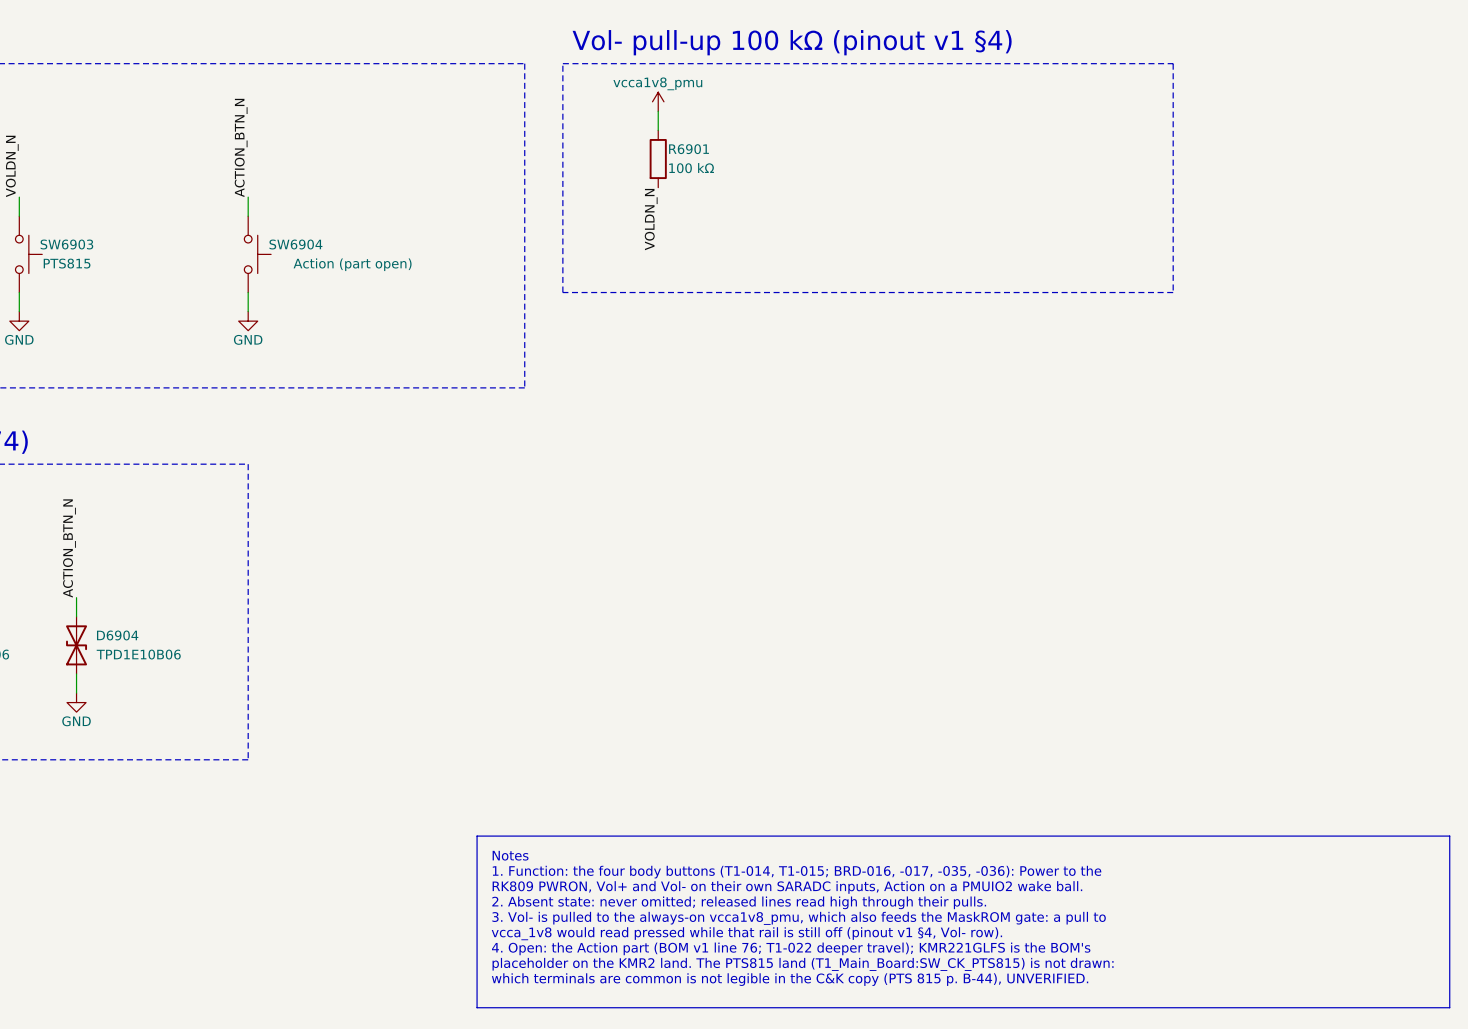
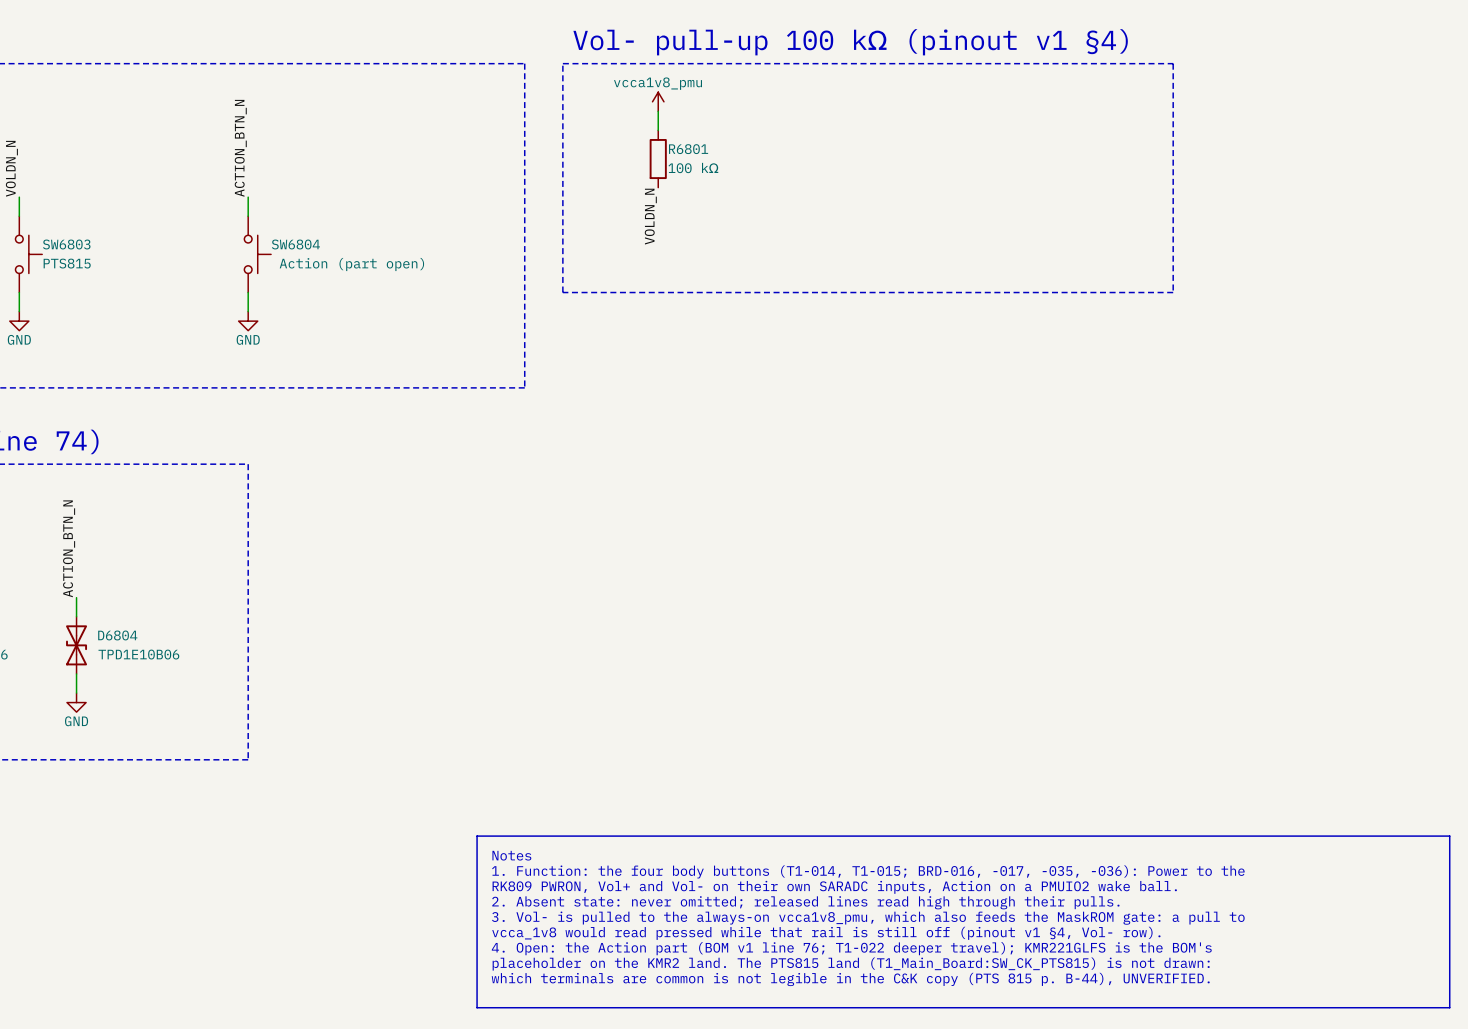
R6901 name: R6901 (689, 149) -> R6801 (688, 149)
SW6903 name: SW6903 (66, 244) -> SW6803 (66, 244)
SW6904 name: SW6904 (295, 244) -> SW6804 (295, 244)
D6904 name: D6904 (117, 635) -> D6804 (117, 635)

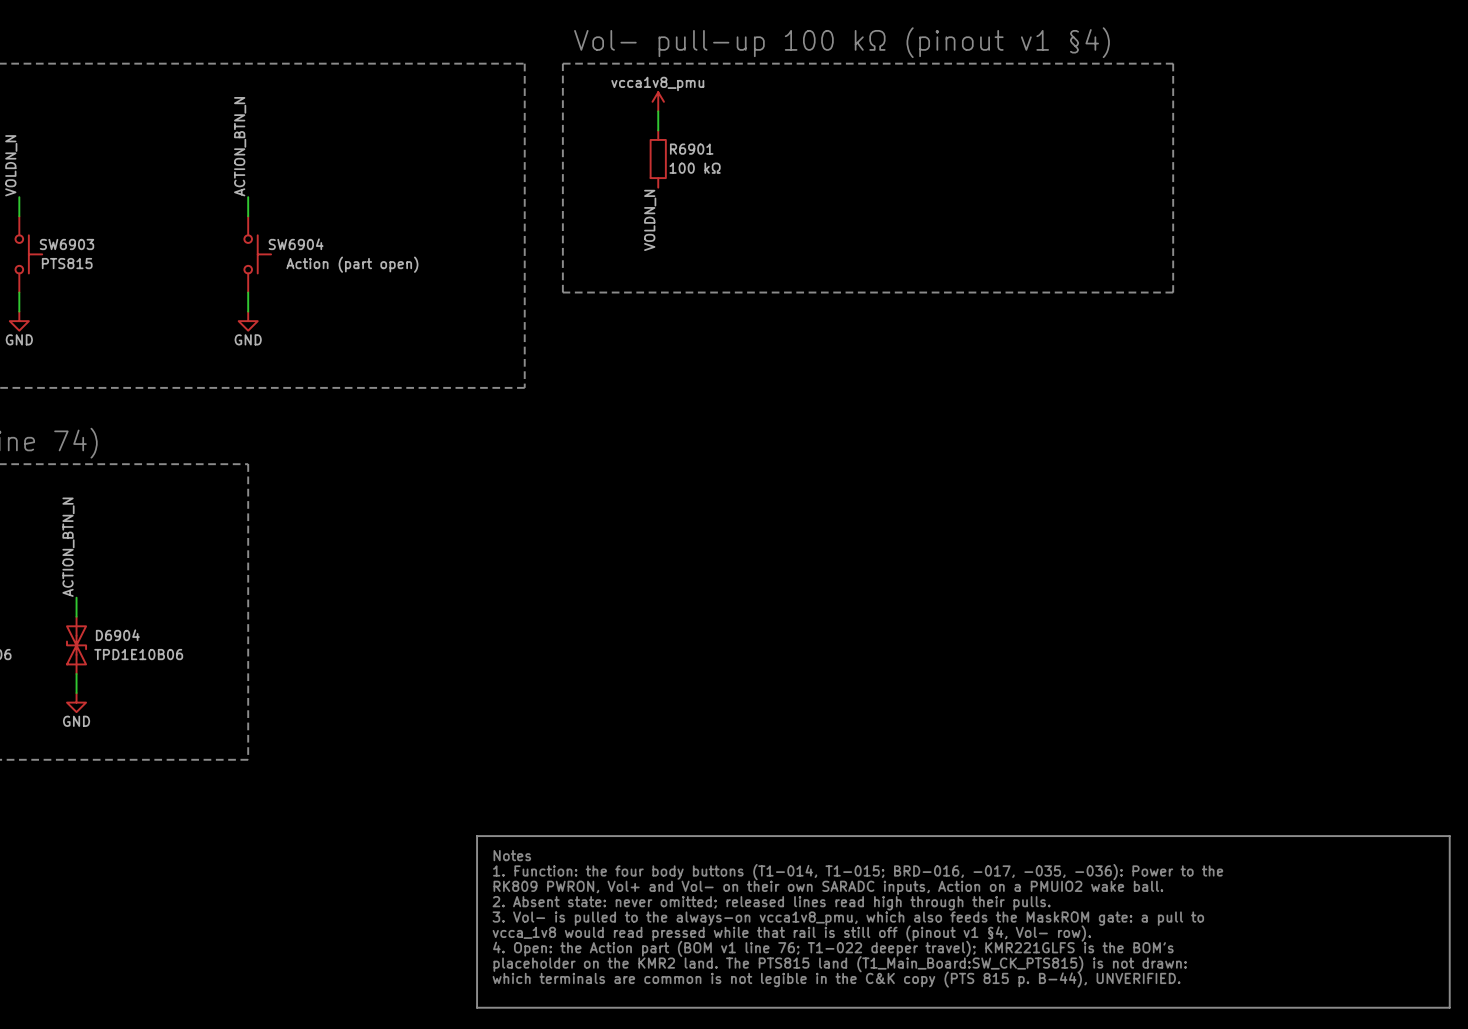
R6801 name: R6801 (688, 149) -> R6901 (691, 149)
SW6803 name: SW6803 (66, 244) -> SW6903 (67, 244)
SW6804 name: SW6804 (295, 244) -> SW6904 (296, 244)
D6804 name: D6804 (117, 635) -> D6904 (117, 635)

